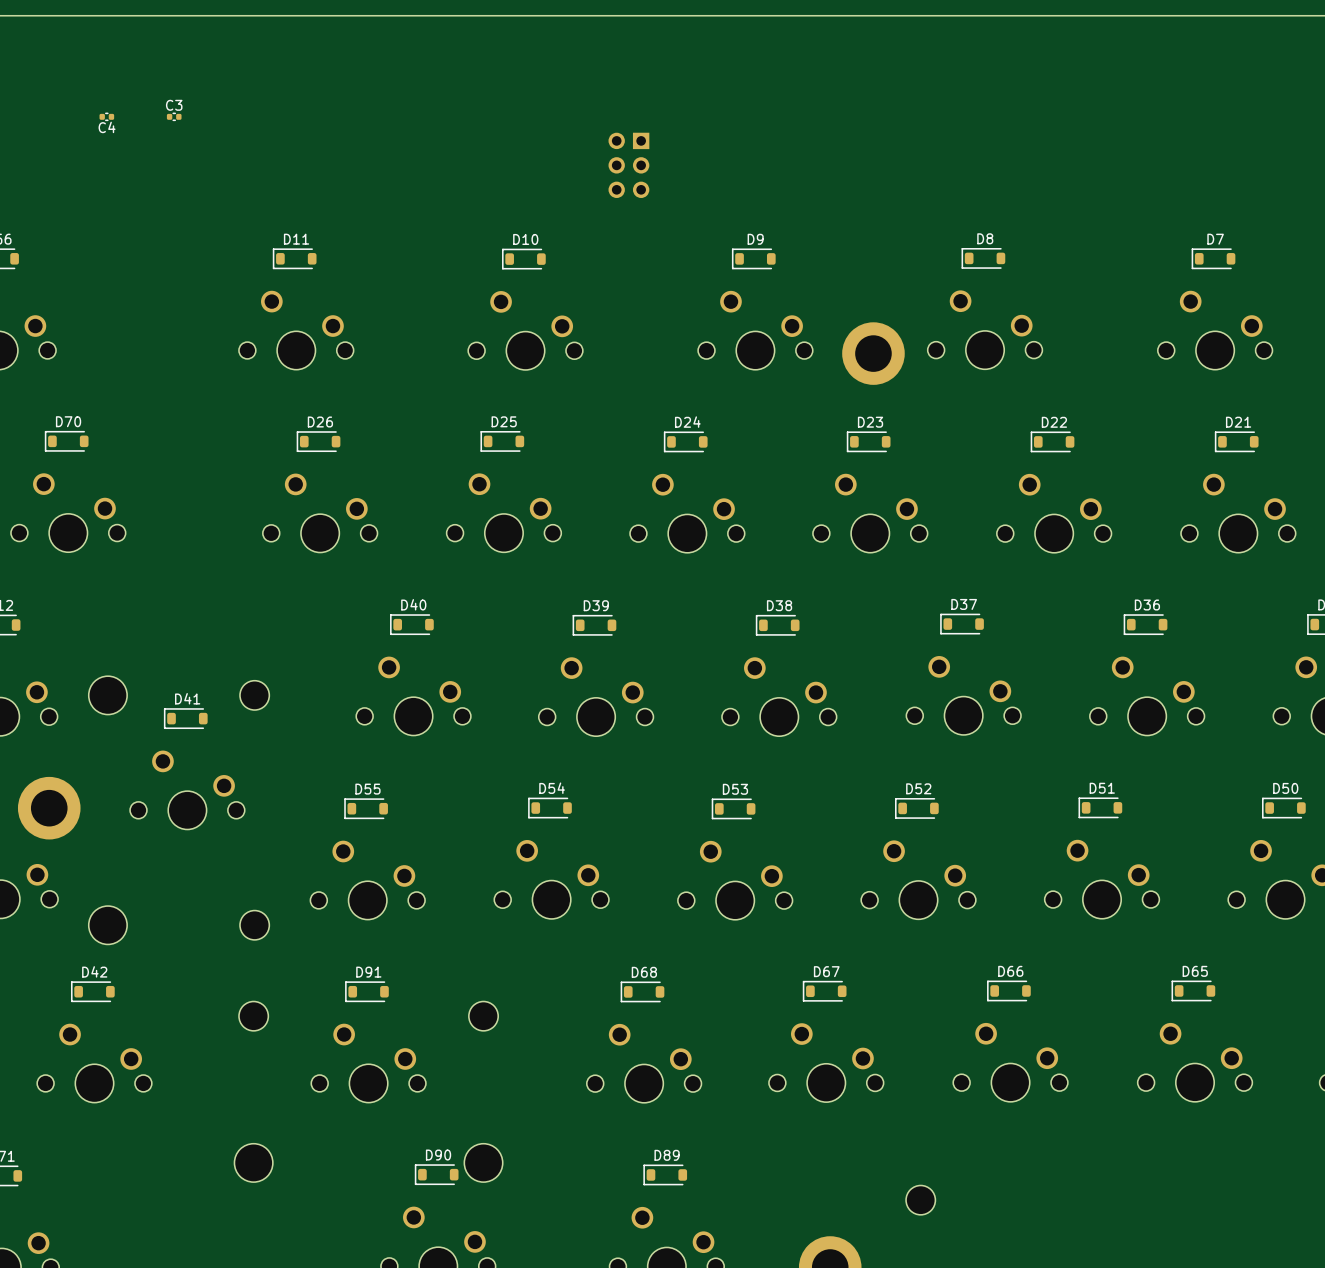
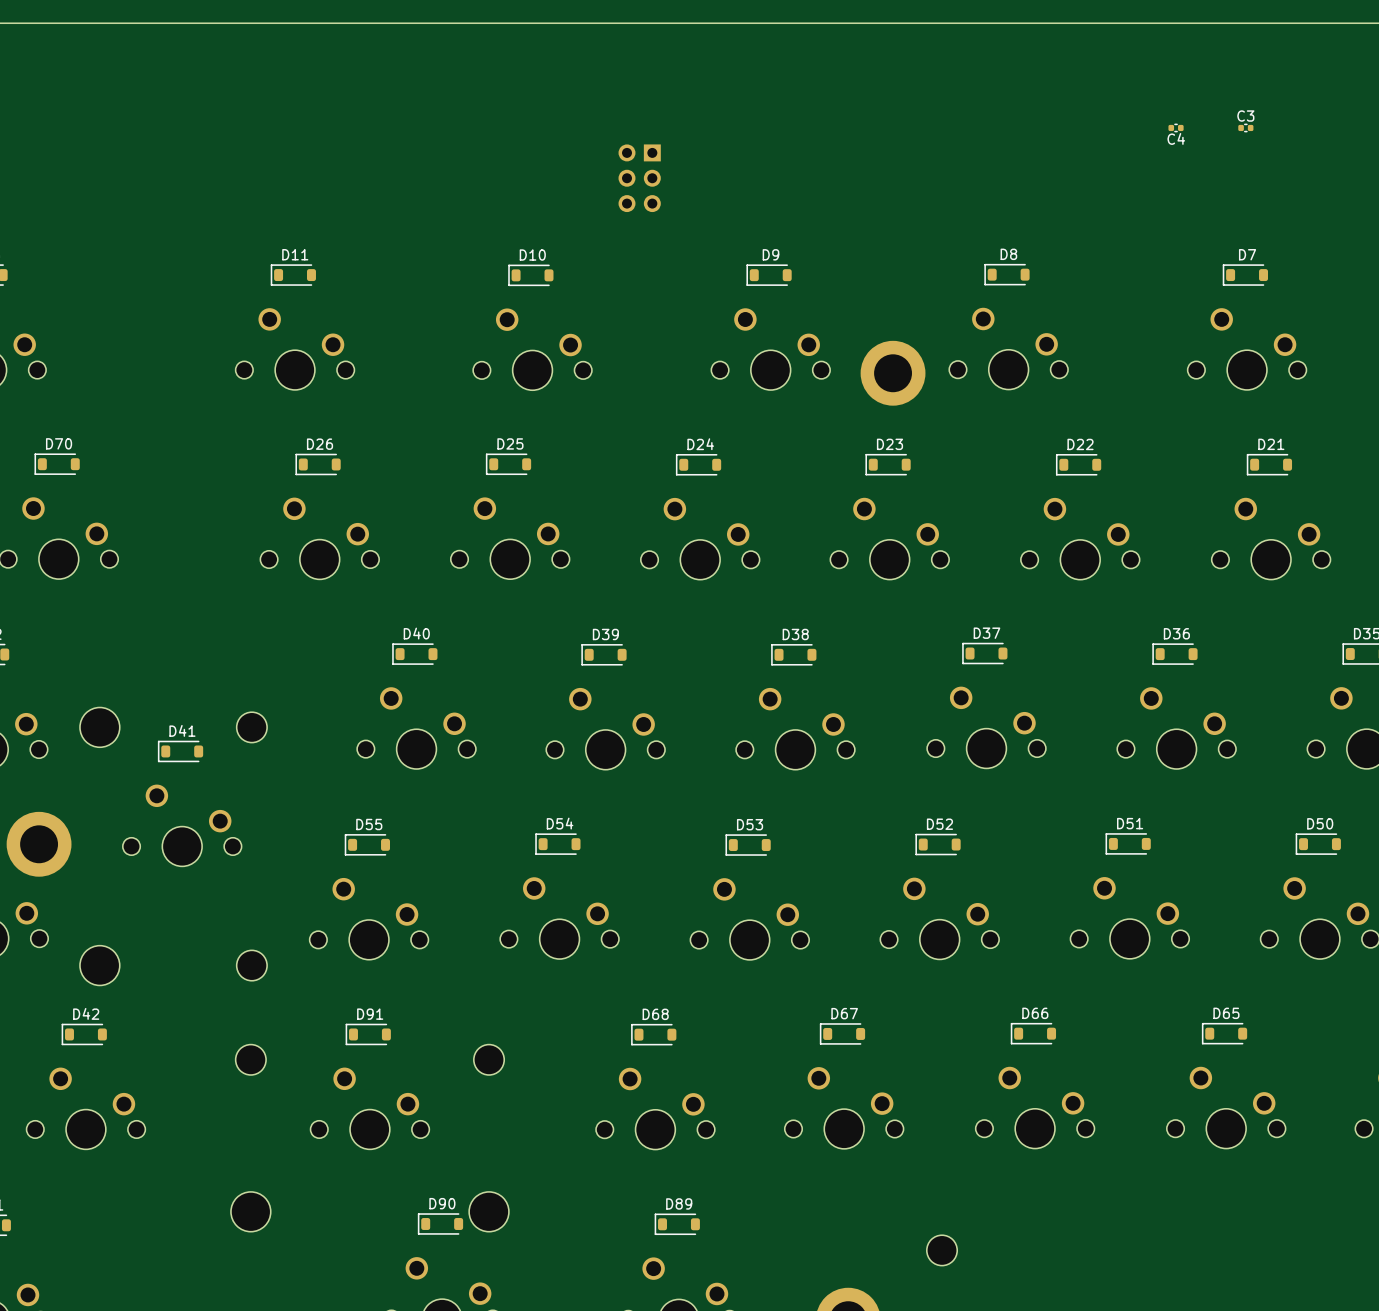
C4 position: (106, 116) -> (1176, 127)
C3 position: (174, 116) -> (1245, 127)

